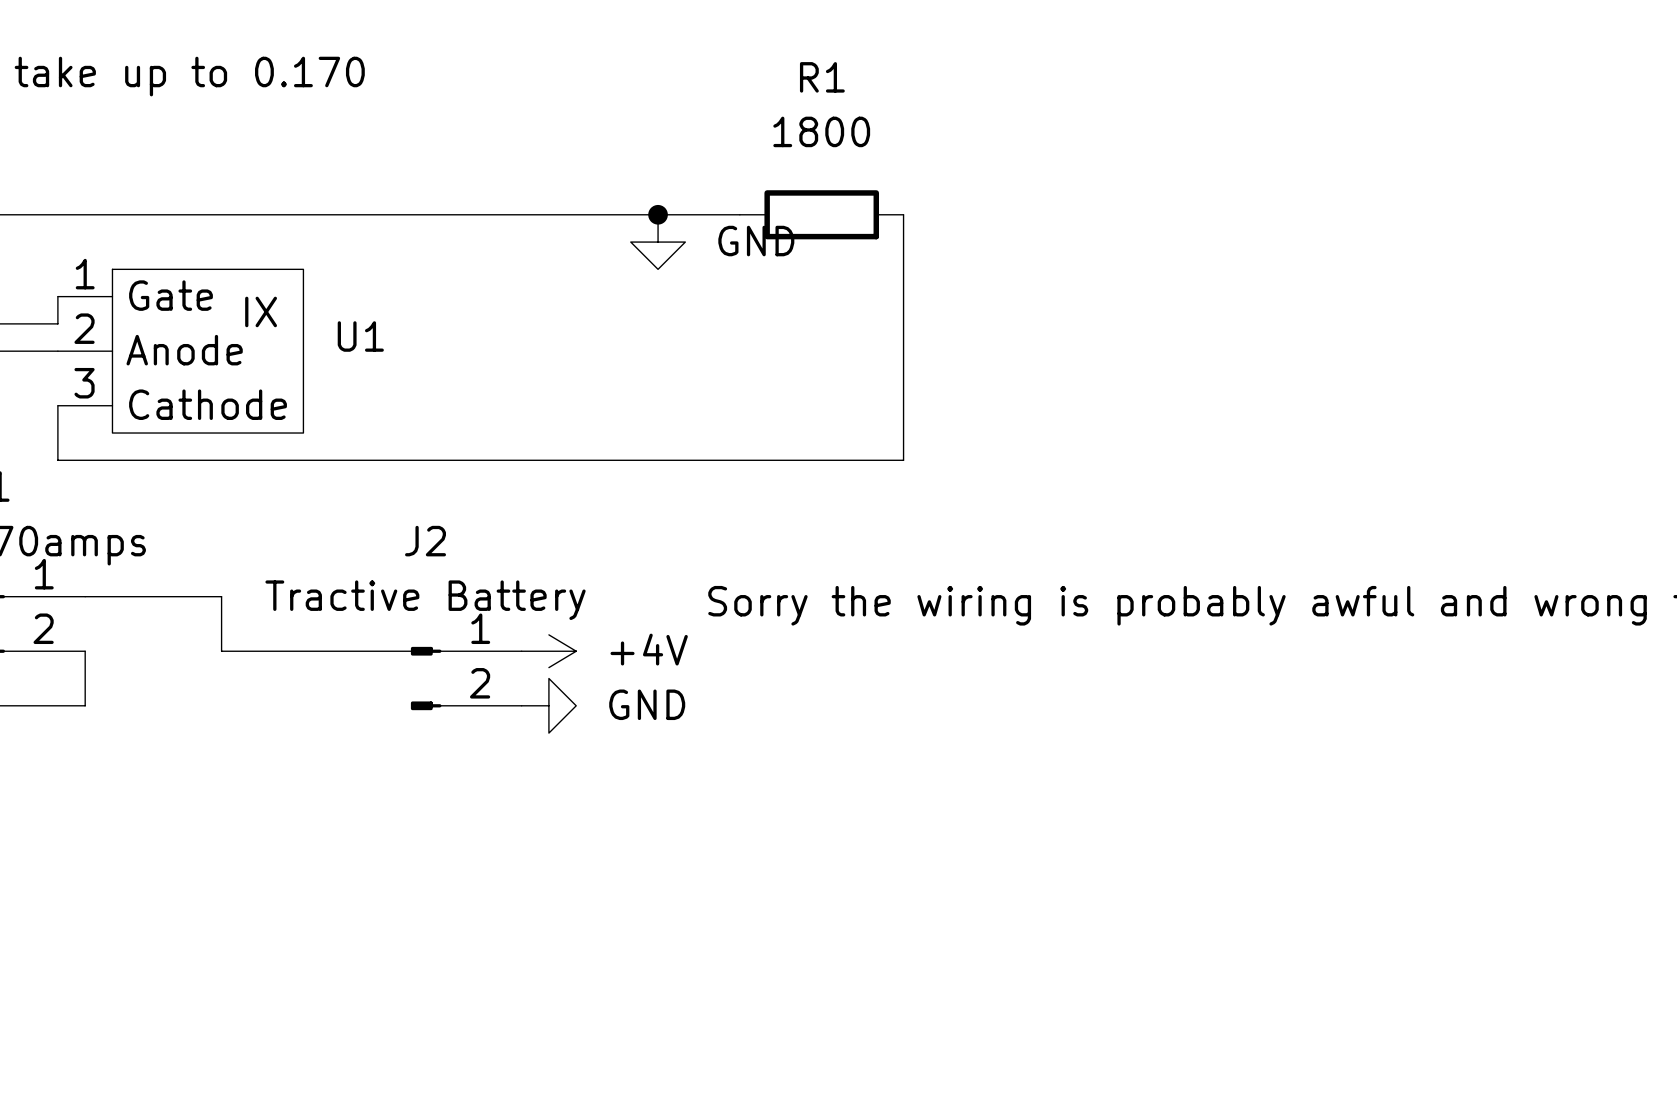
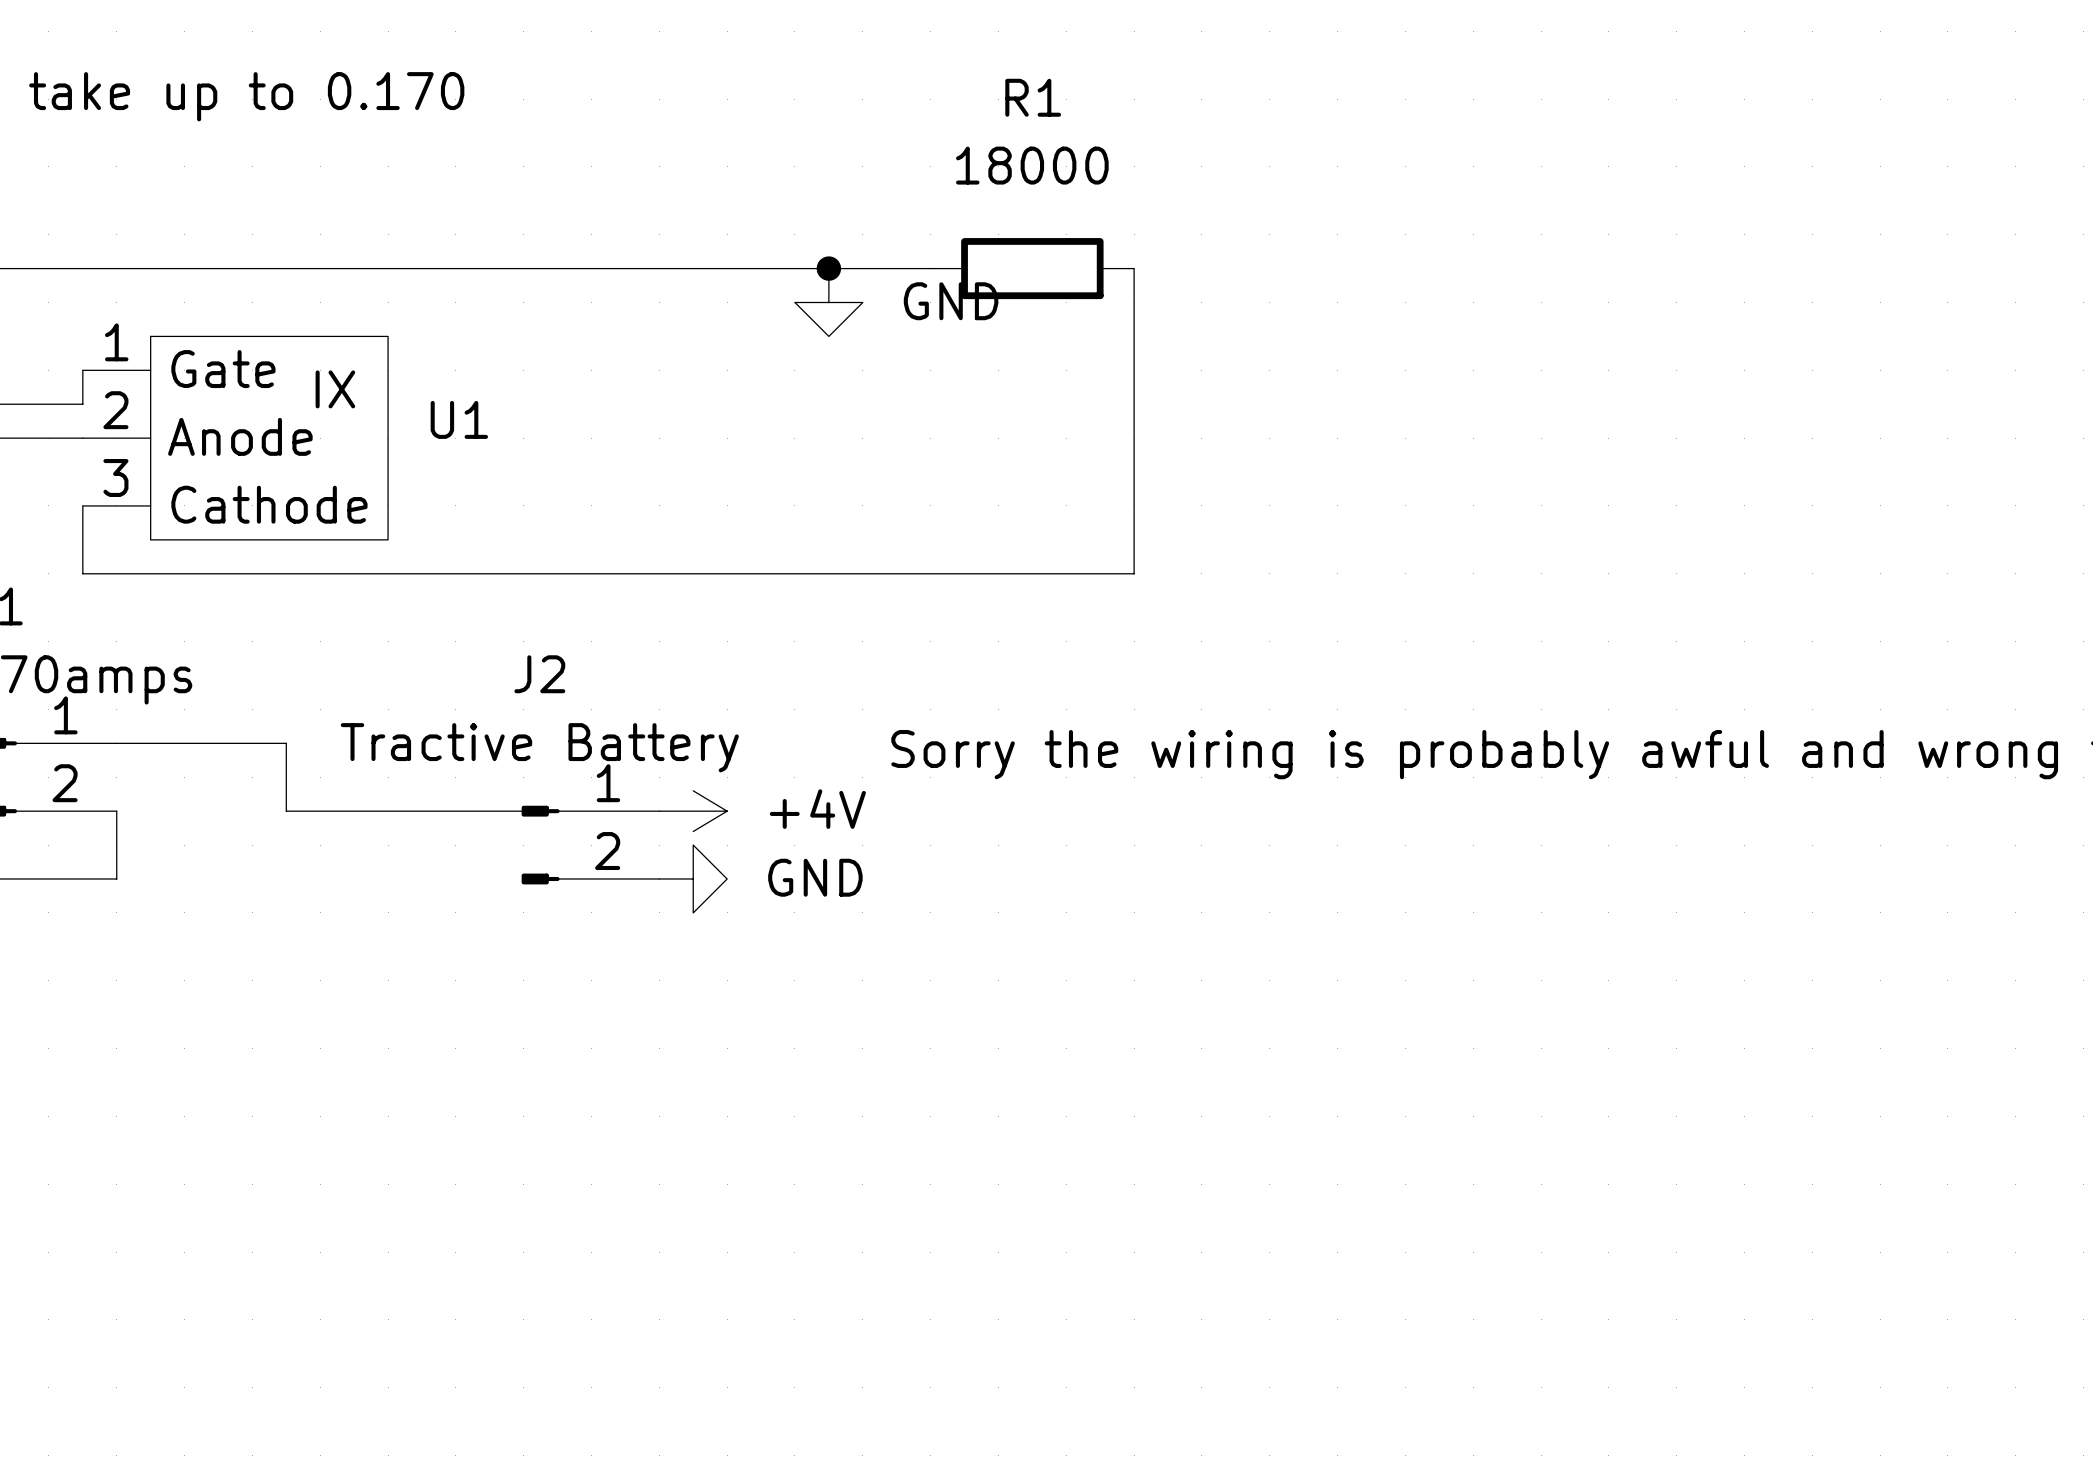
R1 value: 1800 (821, 131) -> 18000 (1032, 165)

